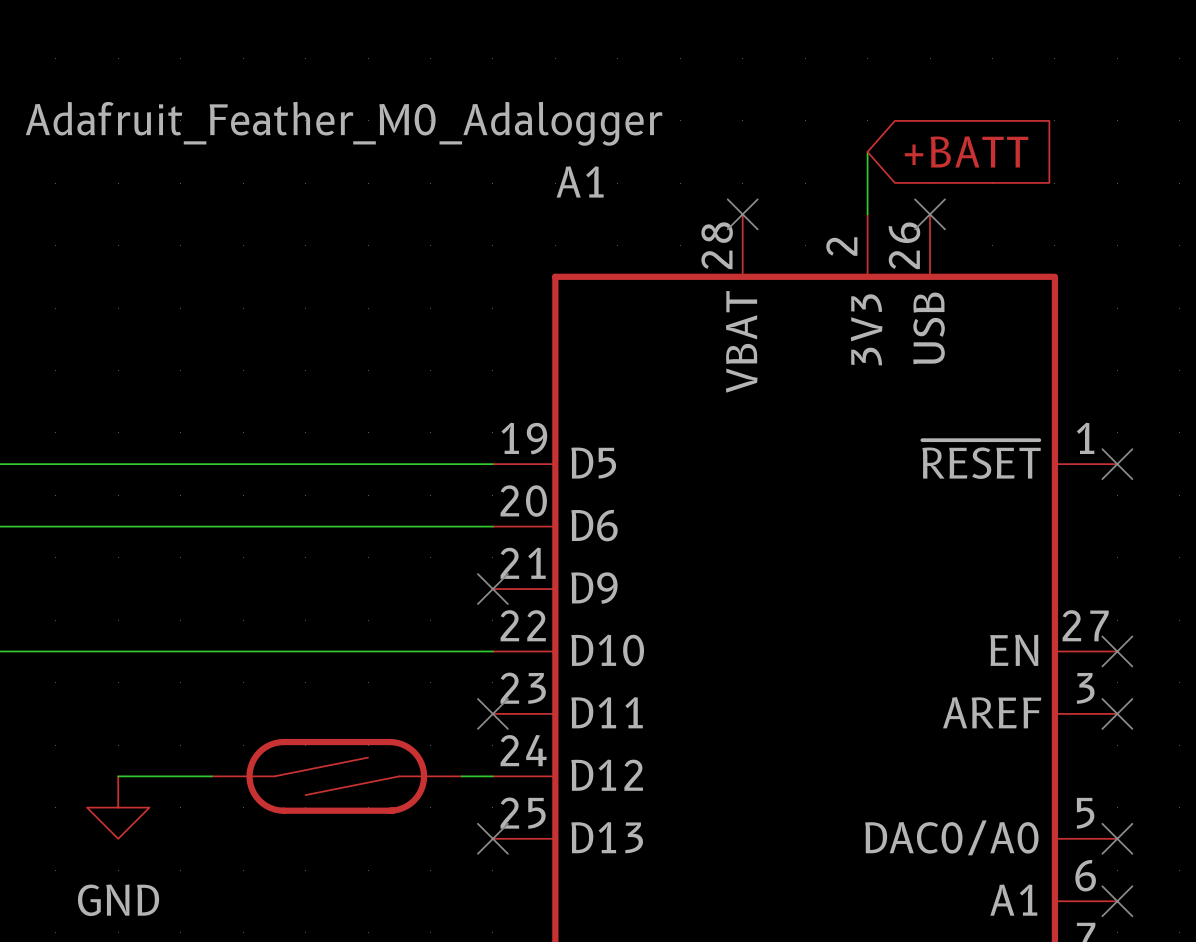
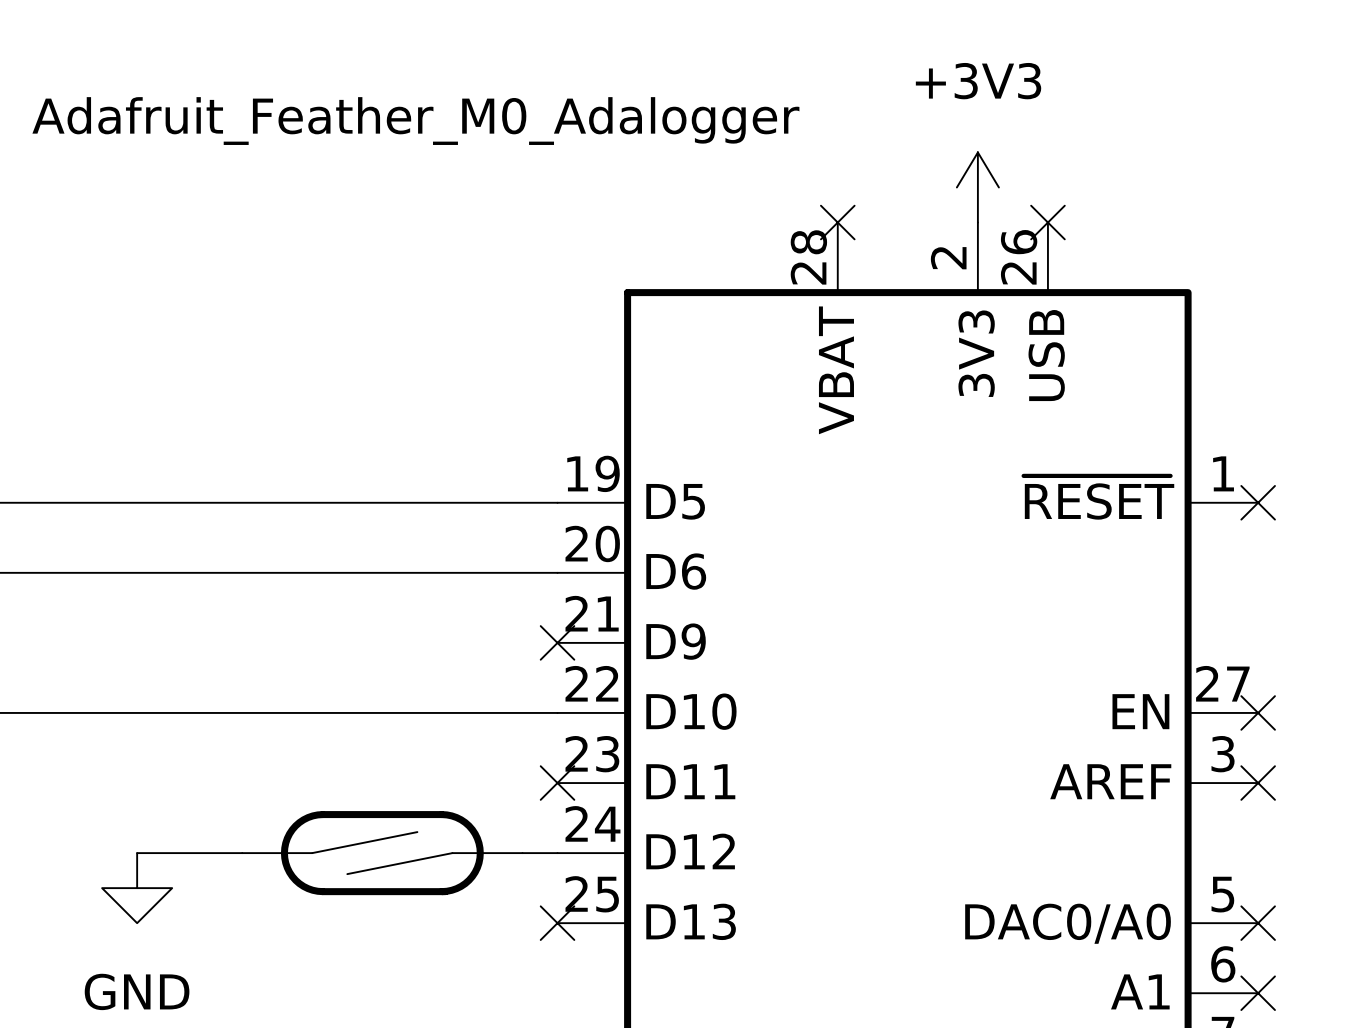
global label: +BATT (966, 151) -> none
A1 name: A1 (580, 181) -> none
power symbol: none -> +3V3 (977, 187)

